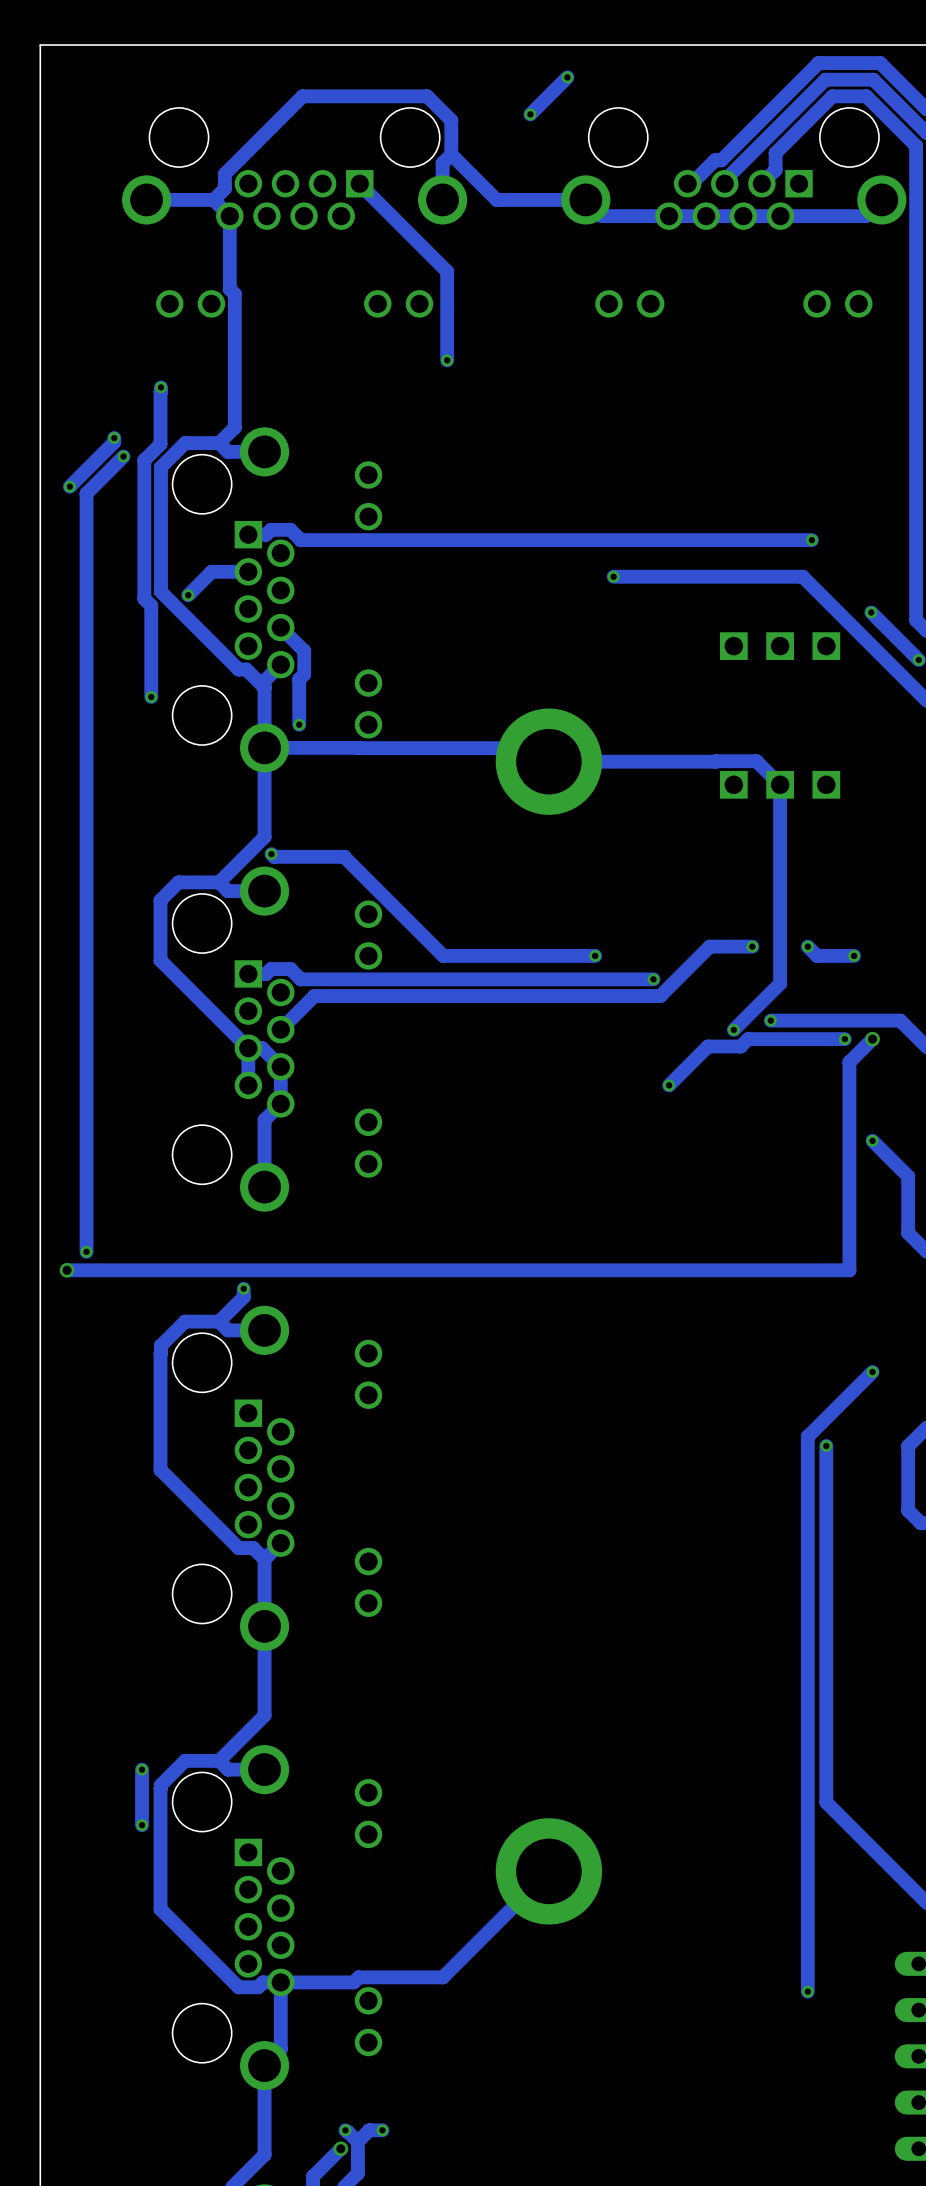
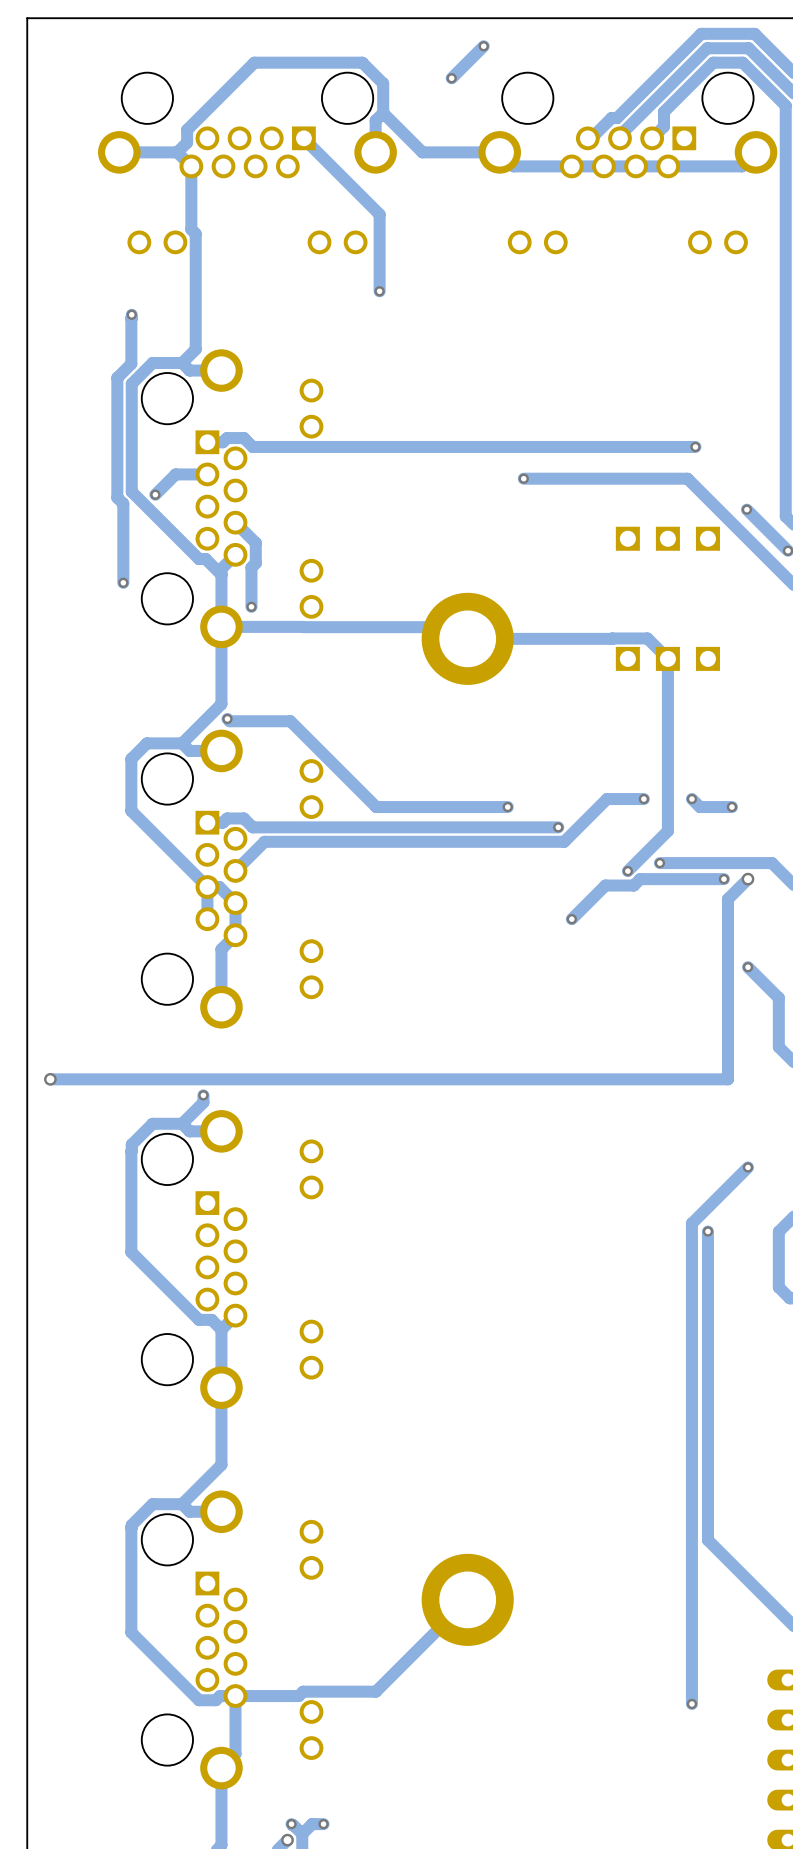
track: (114, 438) (114, 442) (69, 486) -> none
via: (114, 438) -> none
track: (123, 456) (86, 493) (86, 1251) -> none
via: (123, 456) -> none
via: (69, 486) -> none
via: (86, 1251) -> none
track: (142, 1769) (142, 1825) -> none
via: (142, 1769) -> none
via: (142, 1825) -> none

